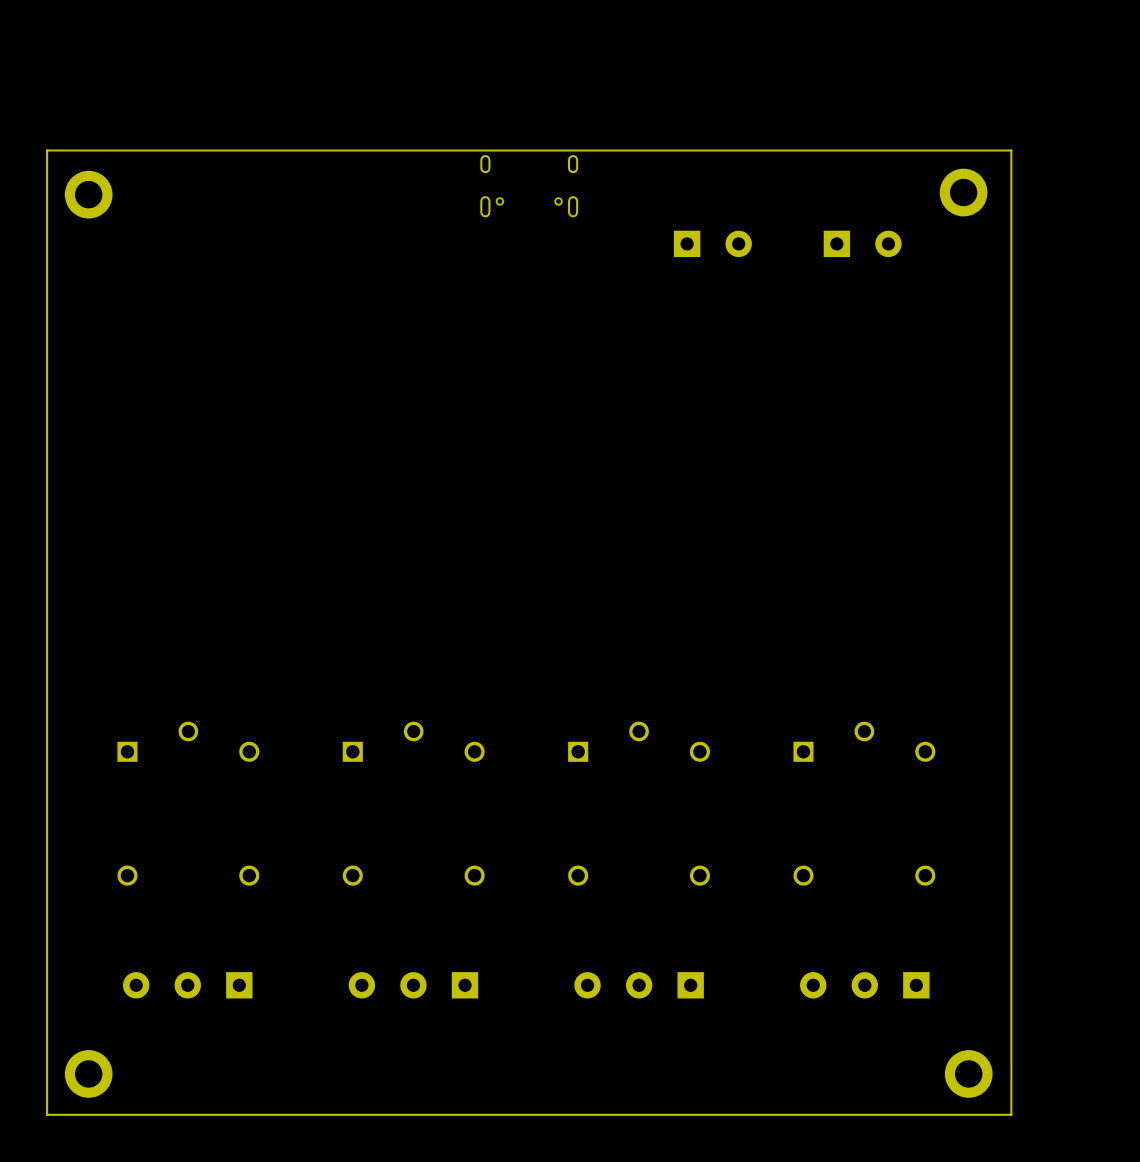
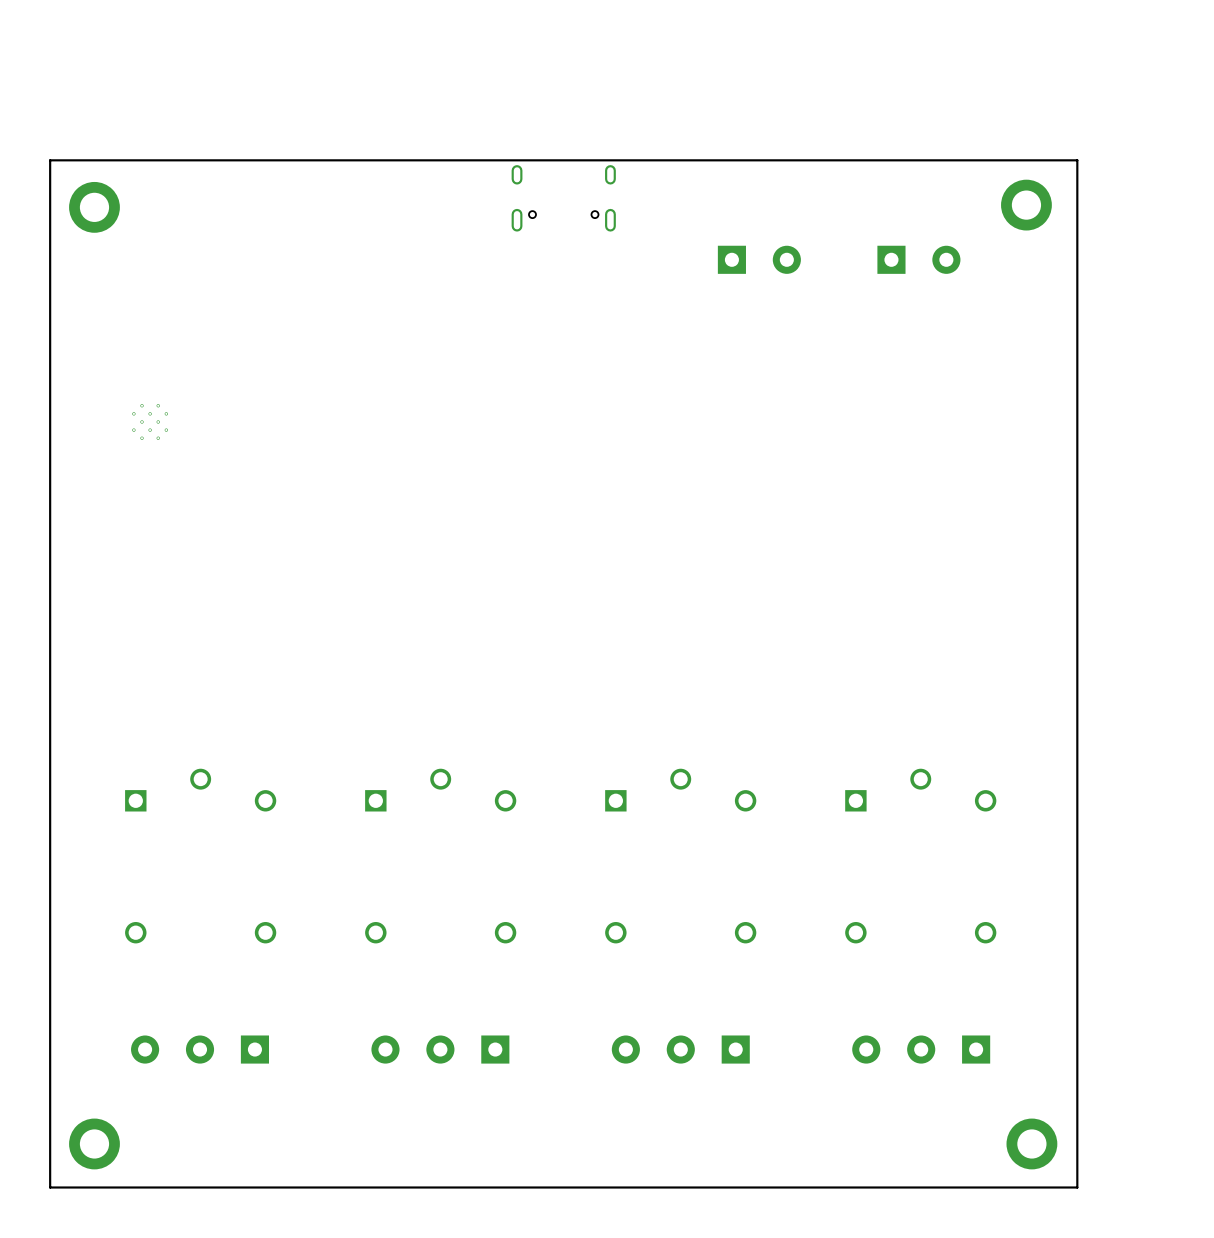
part: none -> (150, 421)

